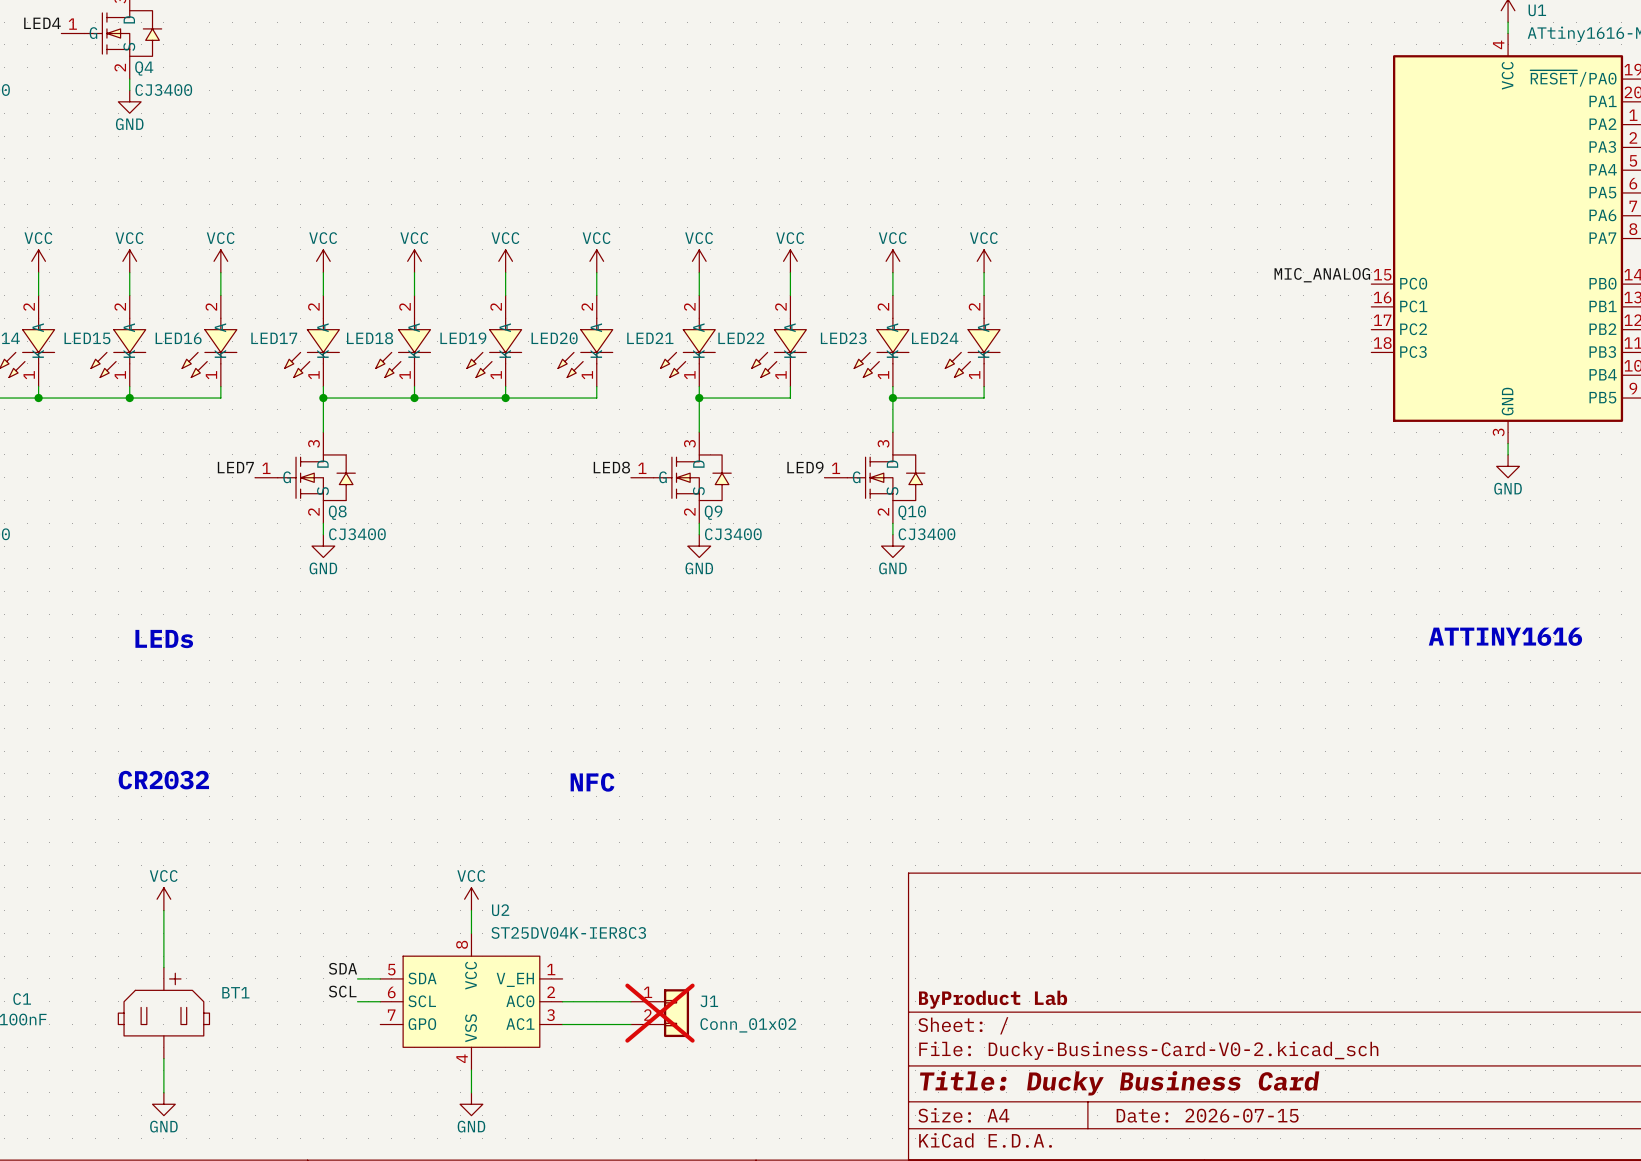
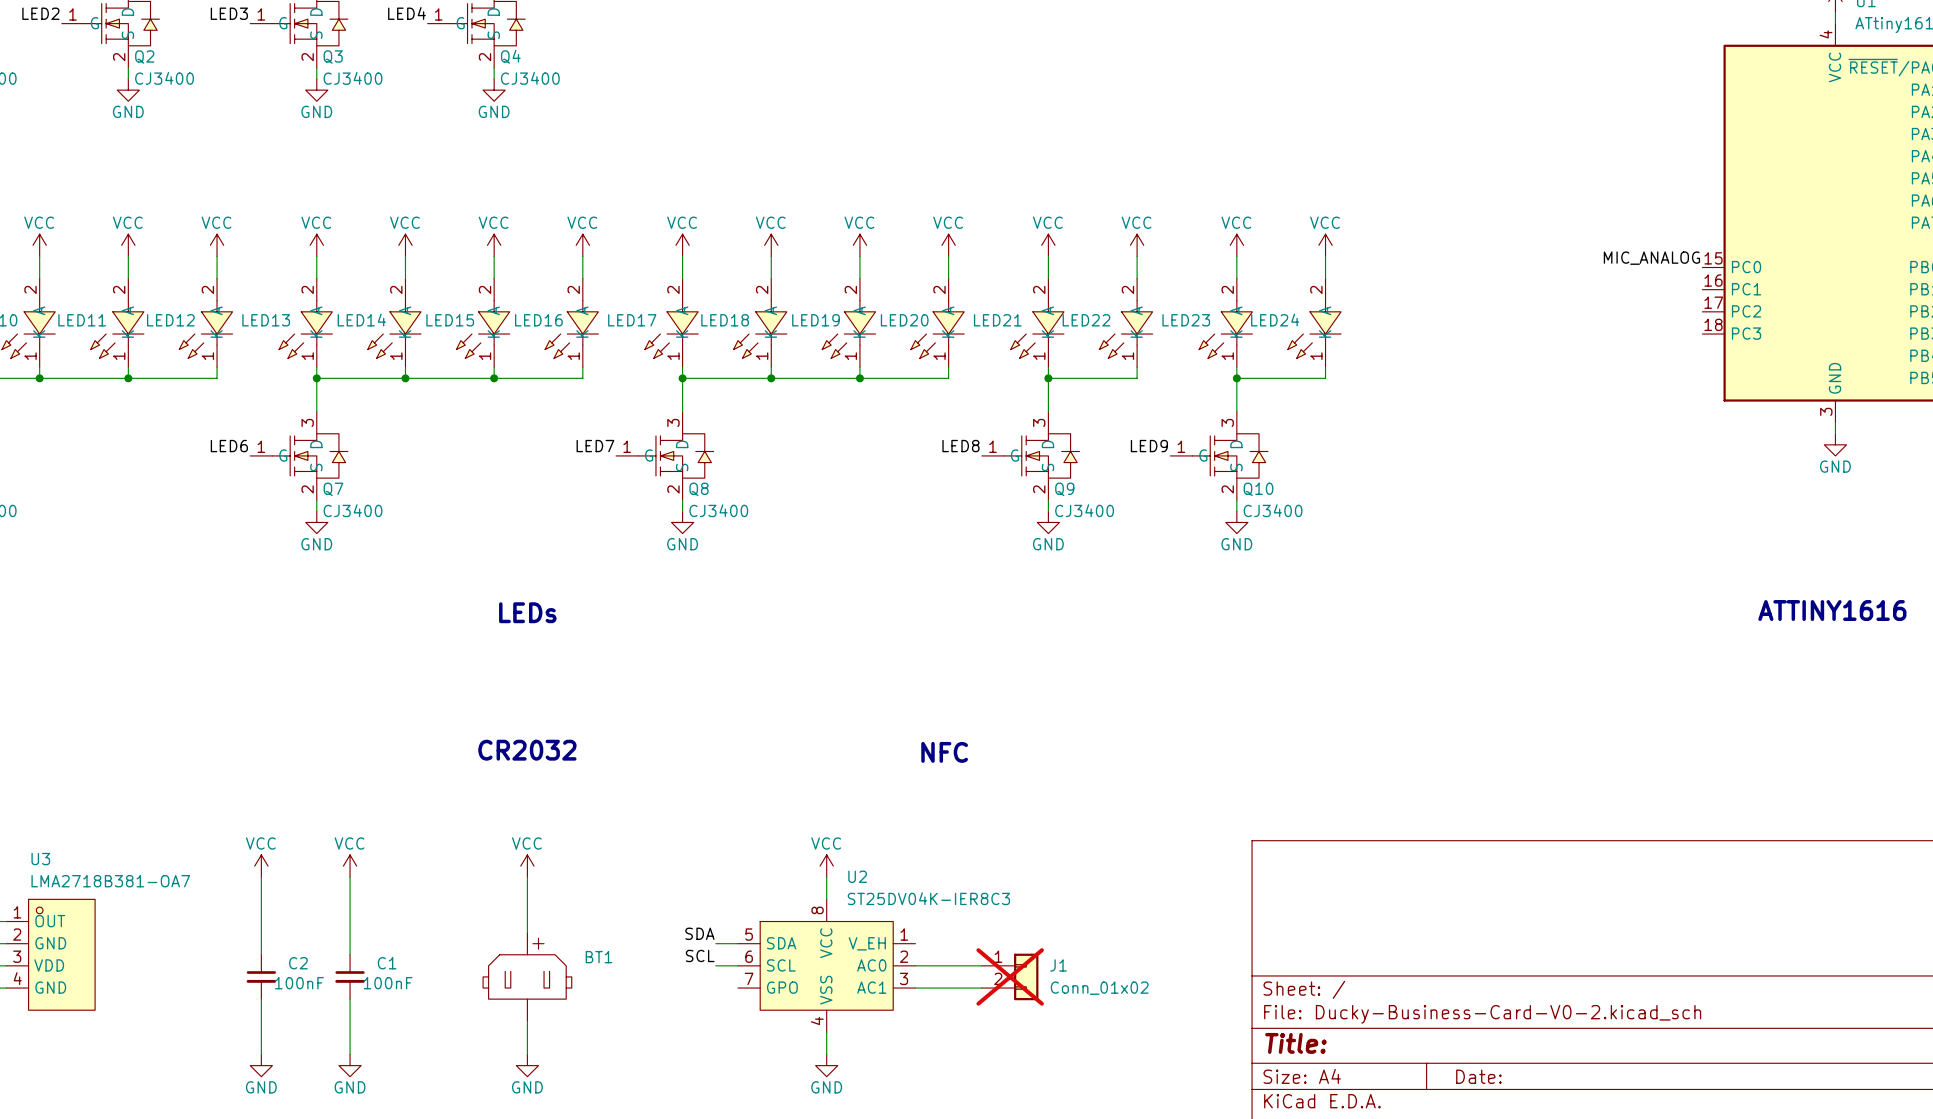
title block: ByProduct Lab (993, 999) -> none
title block: Title: Ducky Business Card (1119, 1083) -> Title: (1295, 1043)
title block: Date: 2026-07-15 (1207, 1115) -> Date: (1478, 1076)

